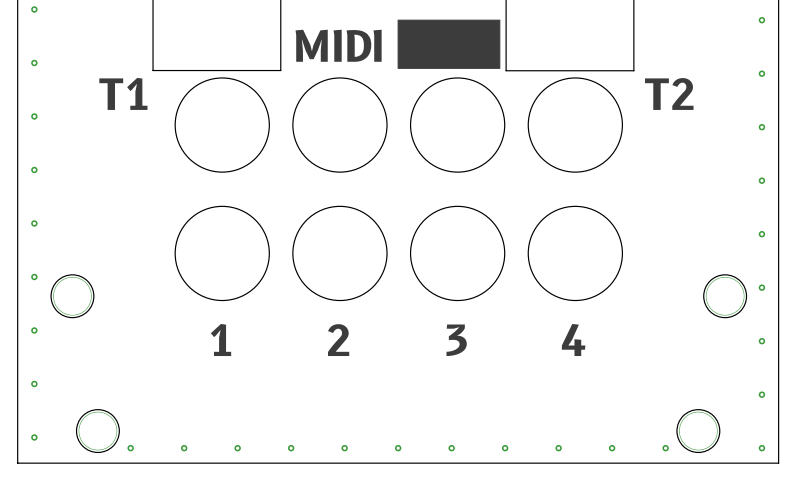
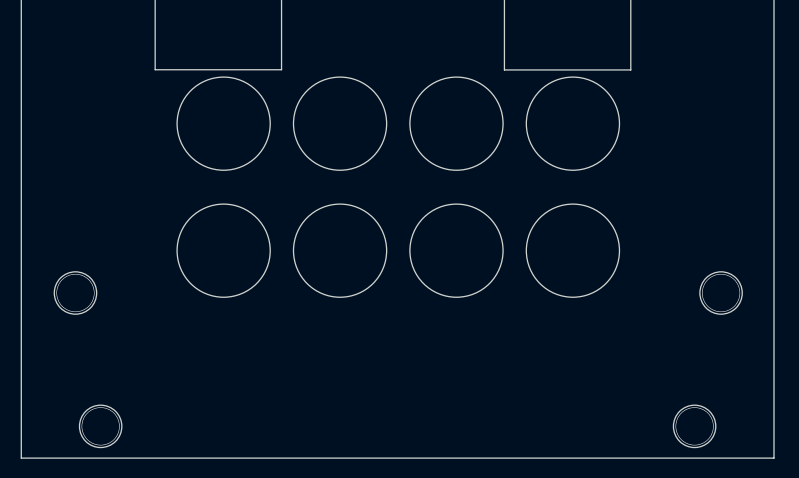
via: (34, 9) -> none
drawing: [397, 19, 501, 69] -> none
via: (761, 20) -> none
text: MIDI (338, 45) -> none
via: (34, 62) -> none
via: (761, 73) -> none
text: T1 (123, 93) -> none
text: T2 (669, 93) -> none
via: (34, 116) -> none
via: (761, 127) -> none
via: (34, 169) -> none
via: (761, 180) -> none
via: (34, 223) -> none
via: (761, 234) -> none
via: (34, 276) -> none
via: (761, 287) -> none
via: (34, 330) -> none
text: 1 (221, 339) -> none
text: 4 (573, 339) -> none
text: 2 (338, 340) -> none
text: 3 (456, 340) -> none
via: (761, 341) -> none
via: (34, 383) -> none
via: (761, 394) -> none
via: (34, 437) -> none
via: (130, 448) -> none
via: (184, 448) -> none
via: (237, 448) -> none
via: (291, 448) -> none
via: (344, 448) -> none
via: (398, 448) -> none
via: (451, 448) -> none
via: (505, 448) -> none
via: (558, 448) -> none
via: (612, 448) -> none
via: (665, 448) -> none
via: (761, 448) -> none

